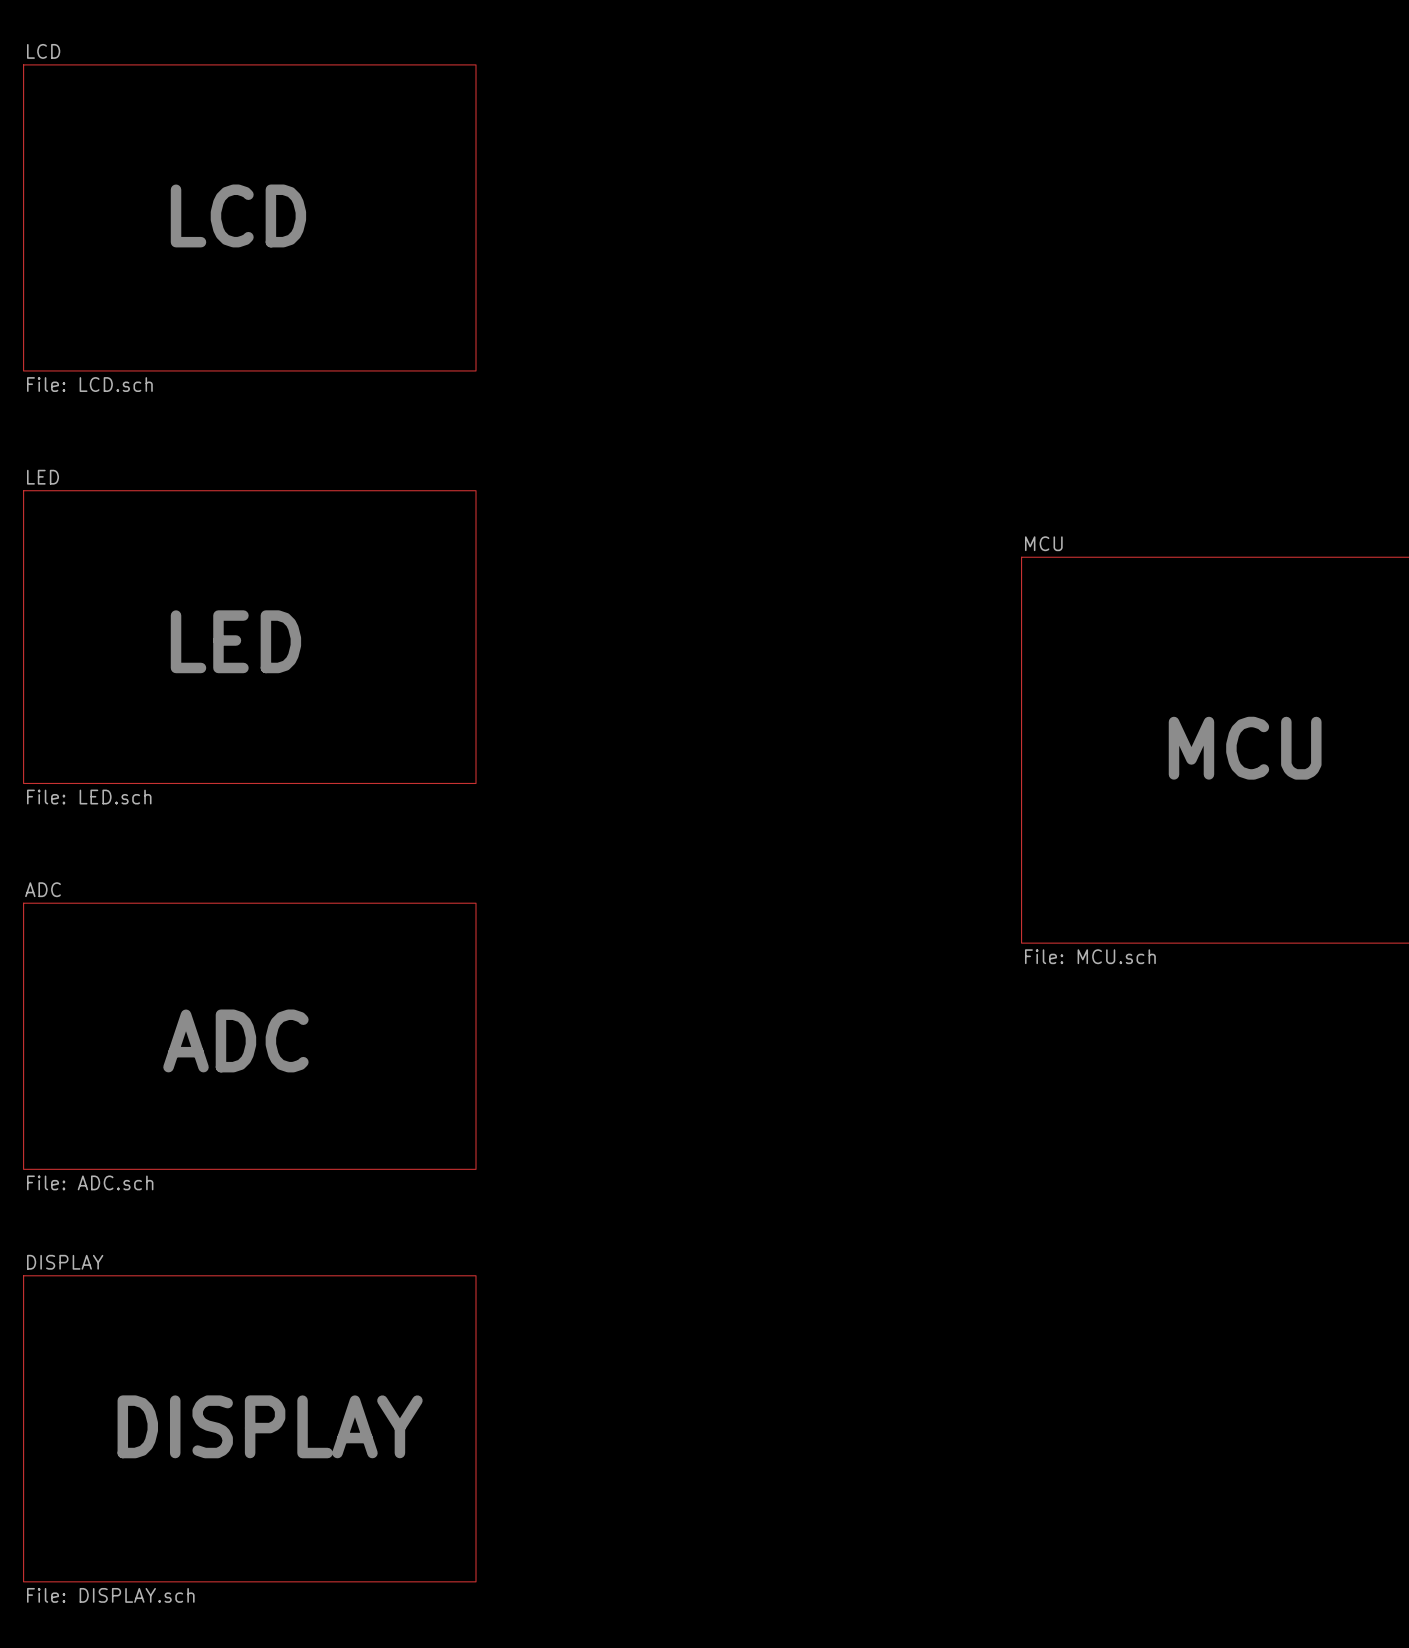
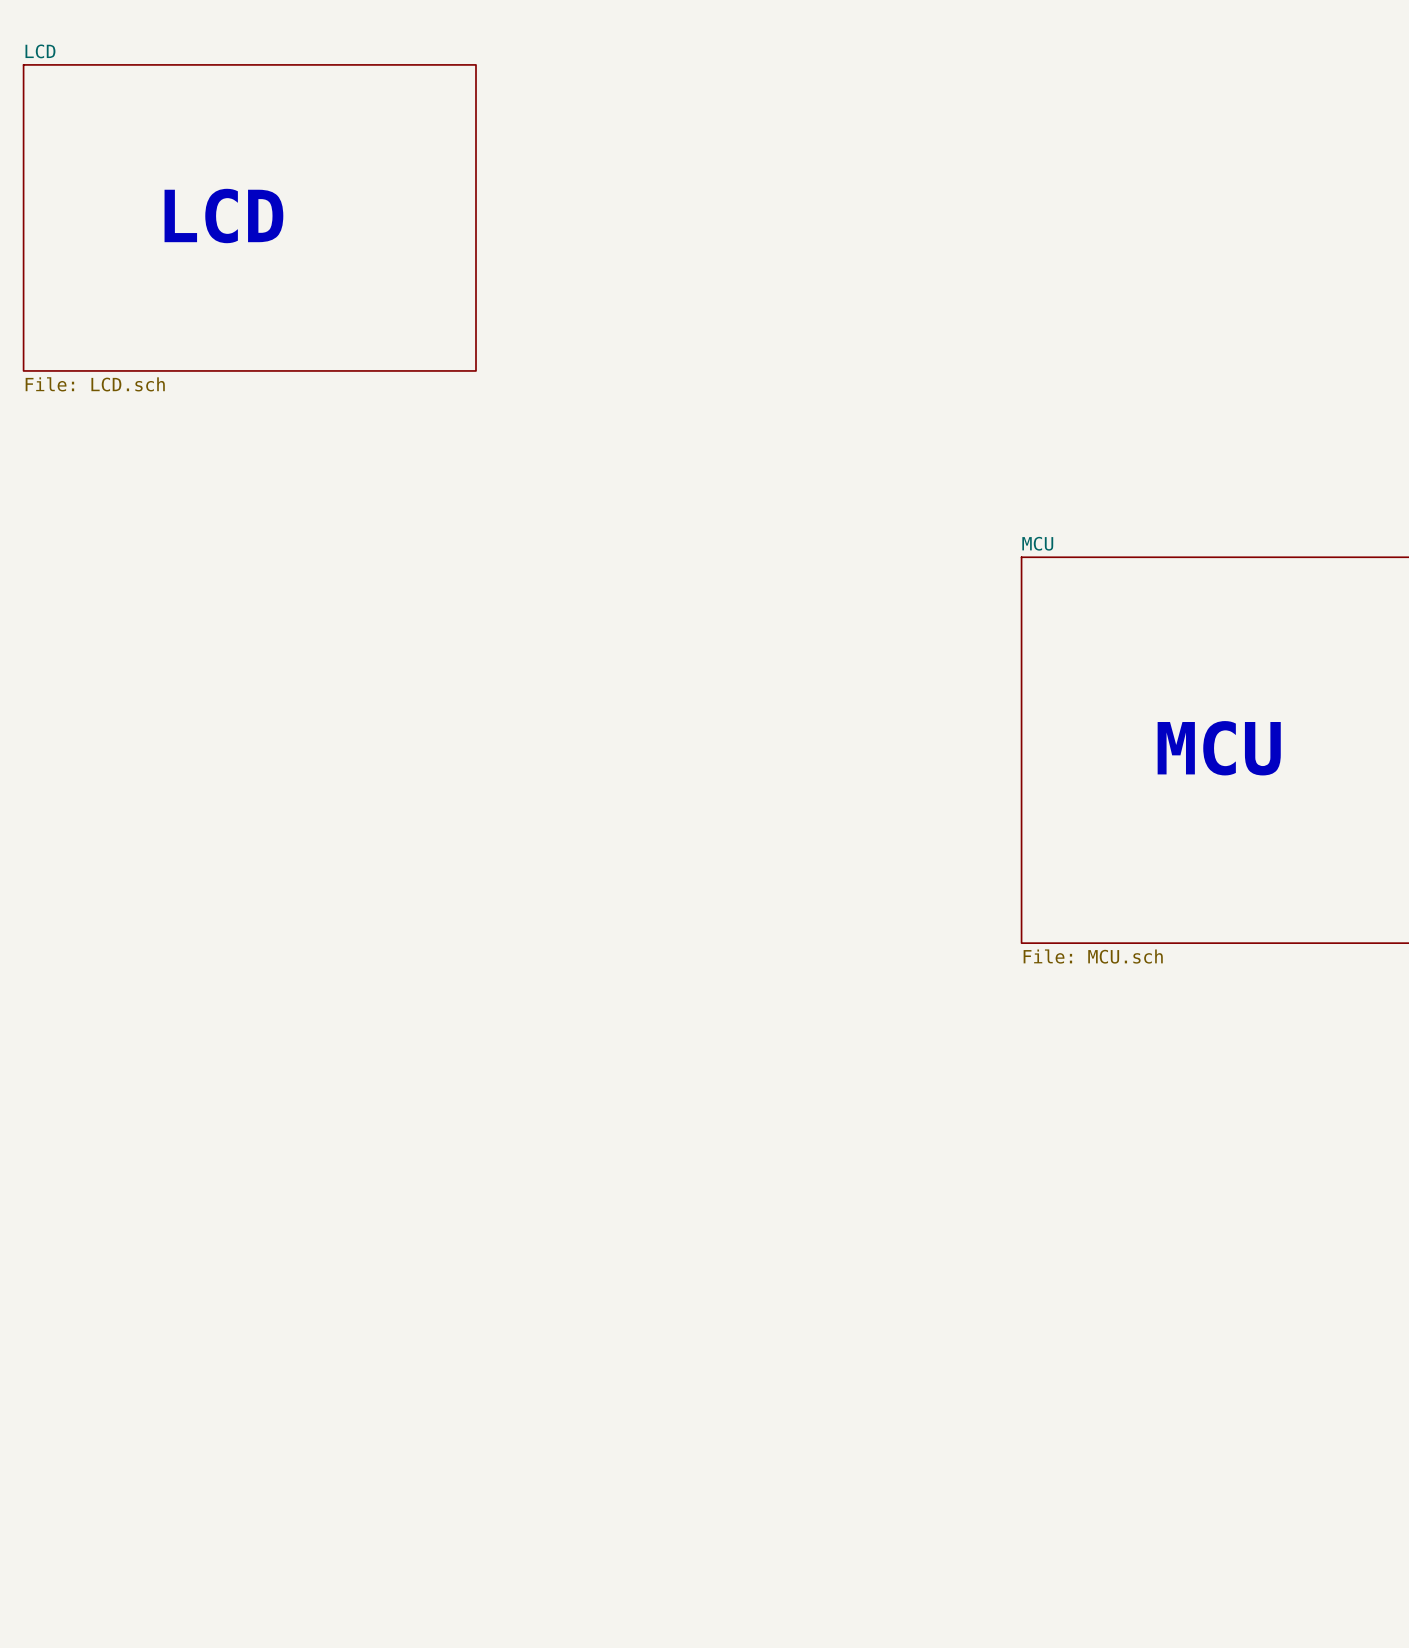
sheet LED: File: LED.sch (249, 637) -> none
text: LED (235, 641) -> none
sheet ADC: File: ADC.sch (249, 1036) -> none
text: ADC (235, 1040) -> none
text: DISPLAY (270, 1426) -> none
sheet DISPLAY: File: DISPLAY.sch (249, 1428) -> none

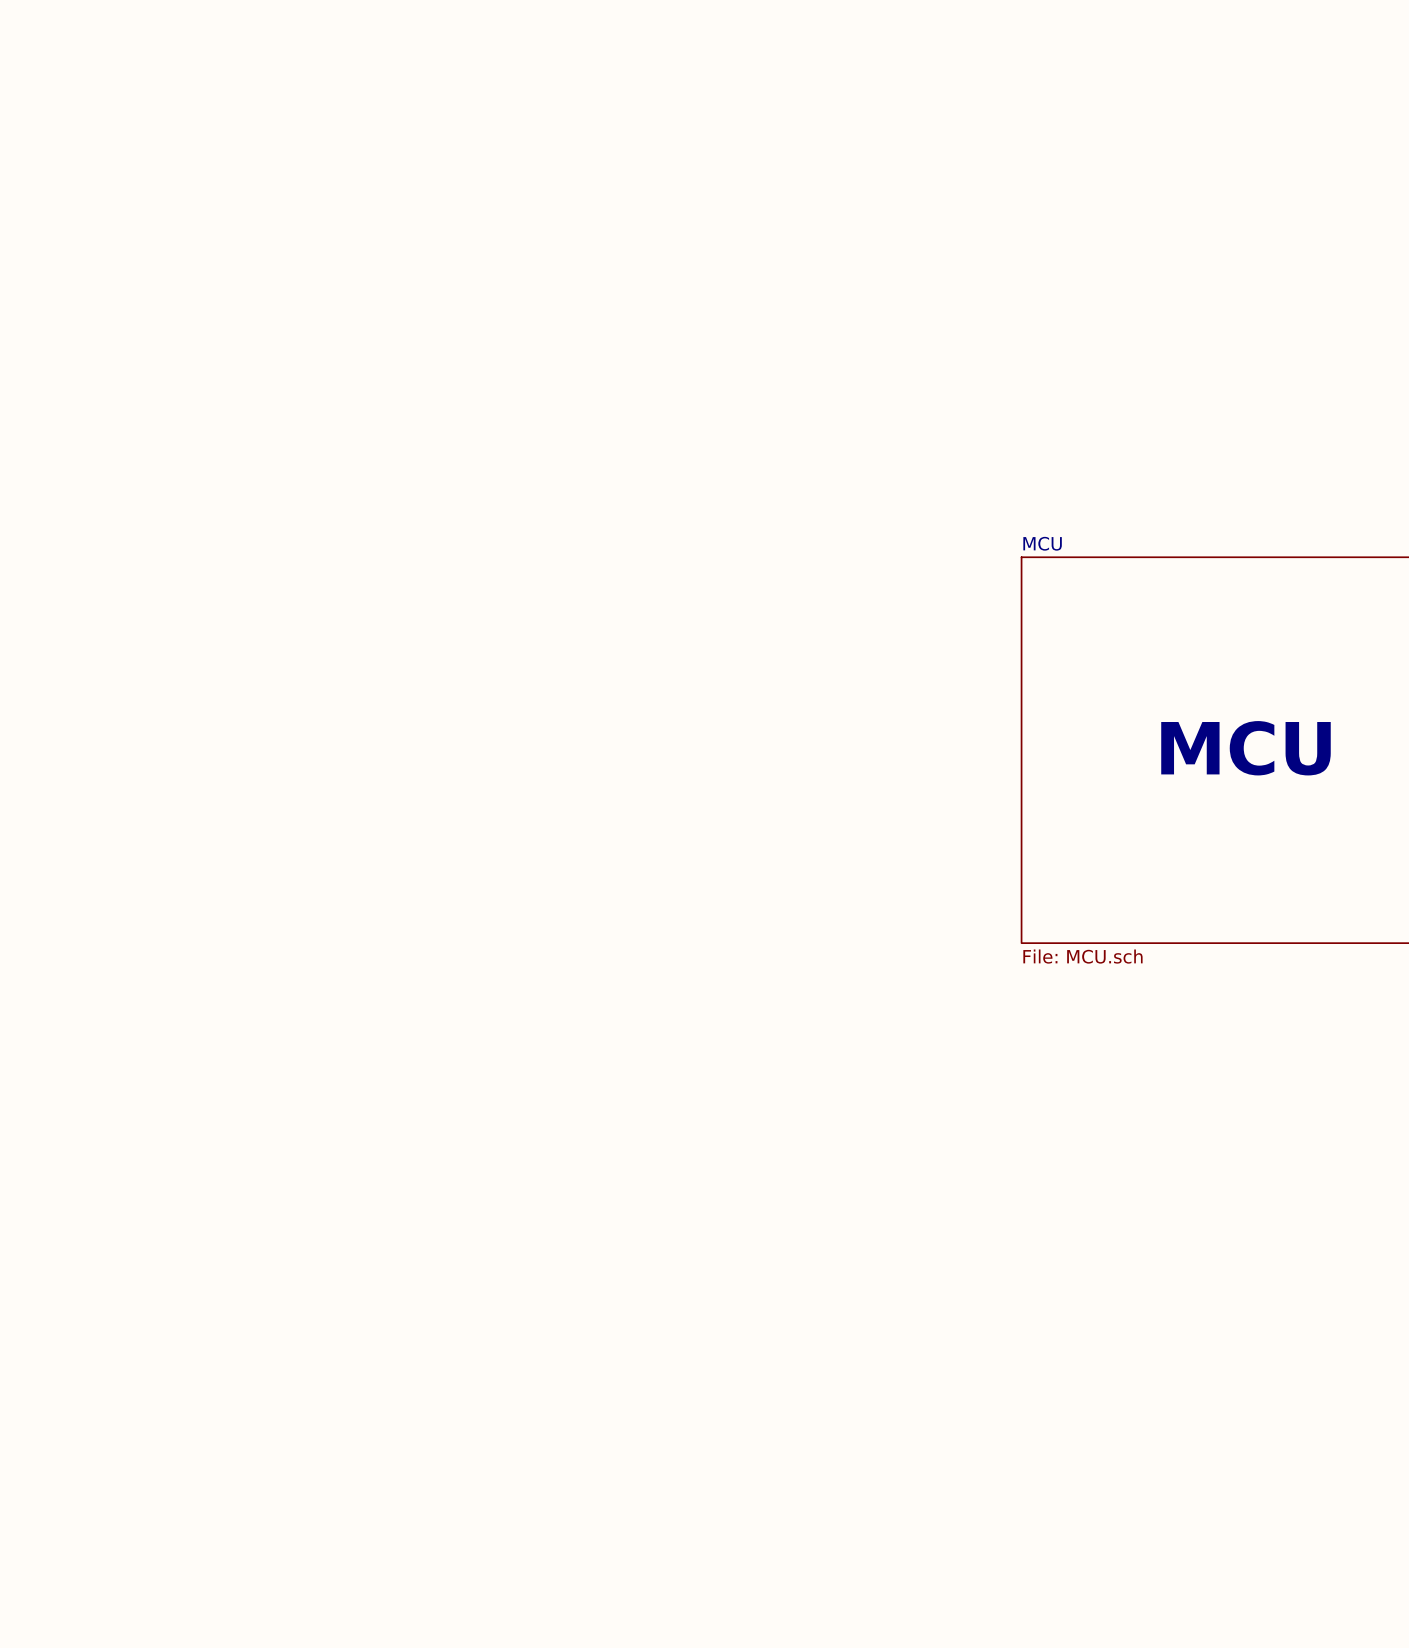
text: LCD (223, 216) -> none
sheet LCD: File: LCD.sch (249, 217) -> none

